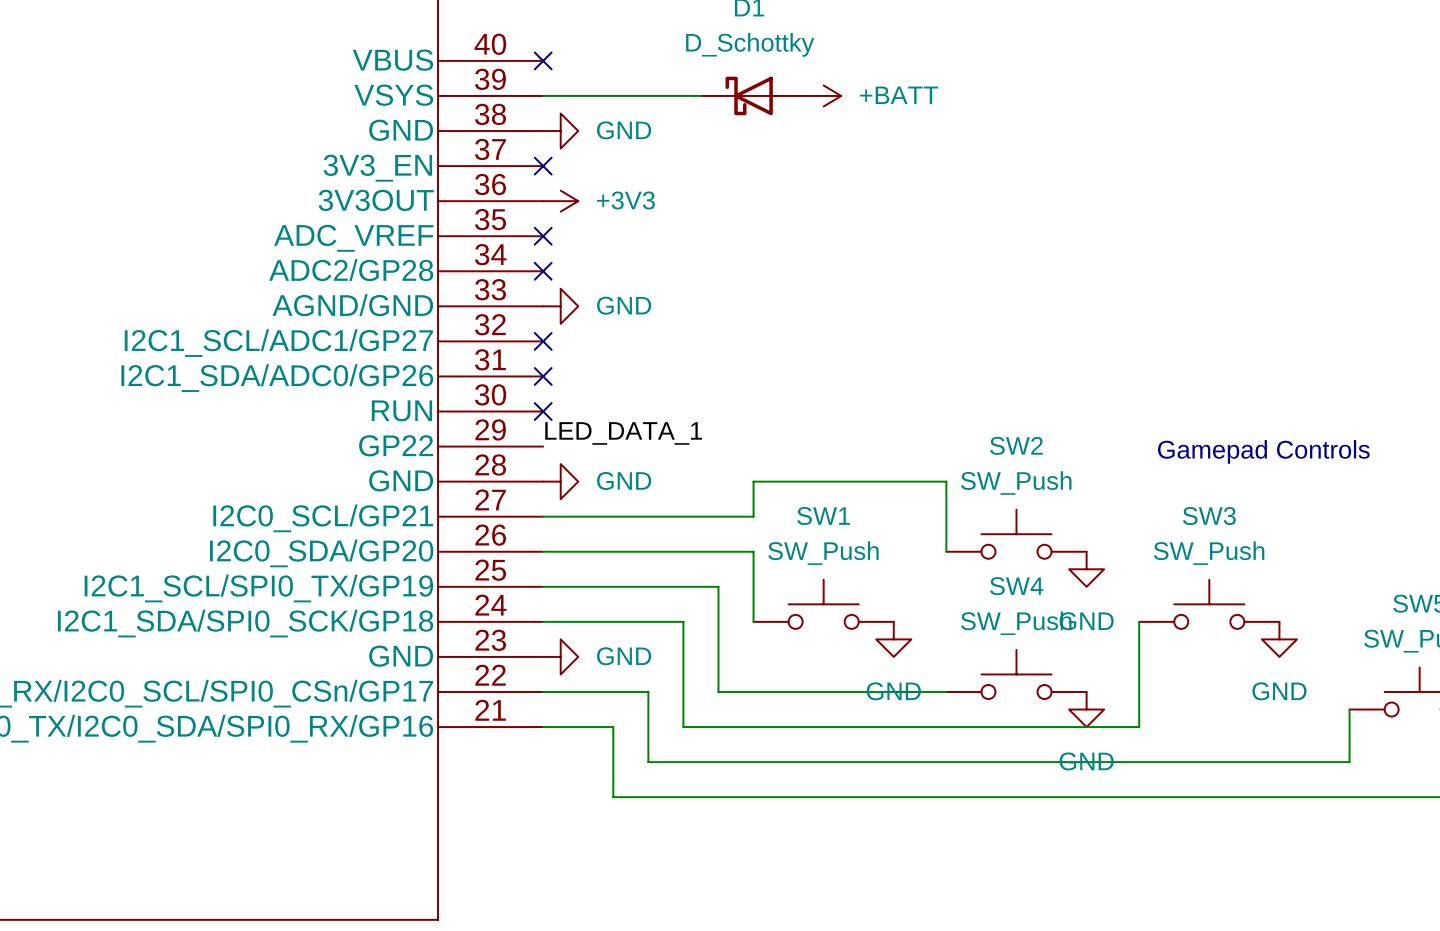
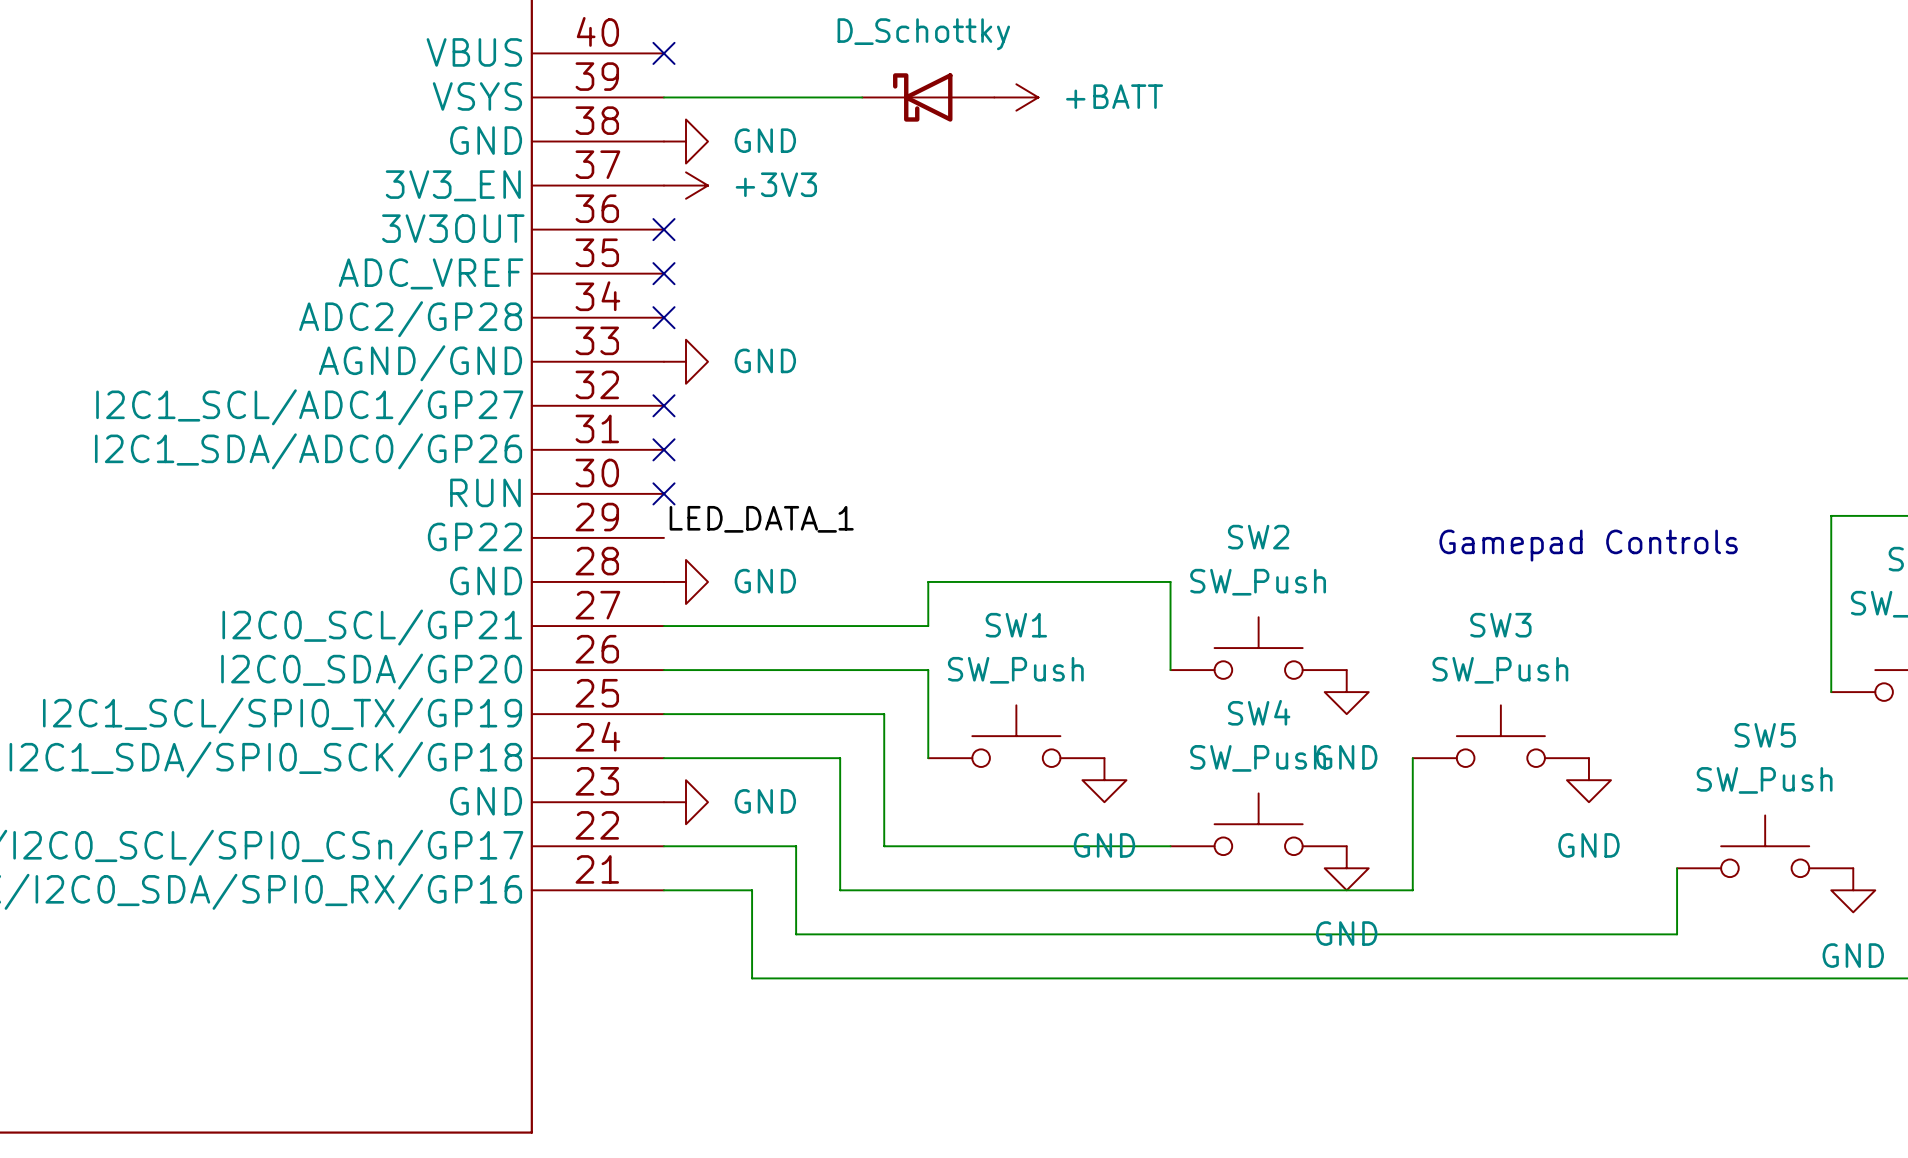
no-connect mark position: (543, 166) -> (663, 229)
power symbol position: +3V3 (560, 201) -> +3V3 (686, 185)

